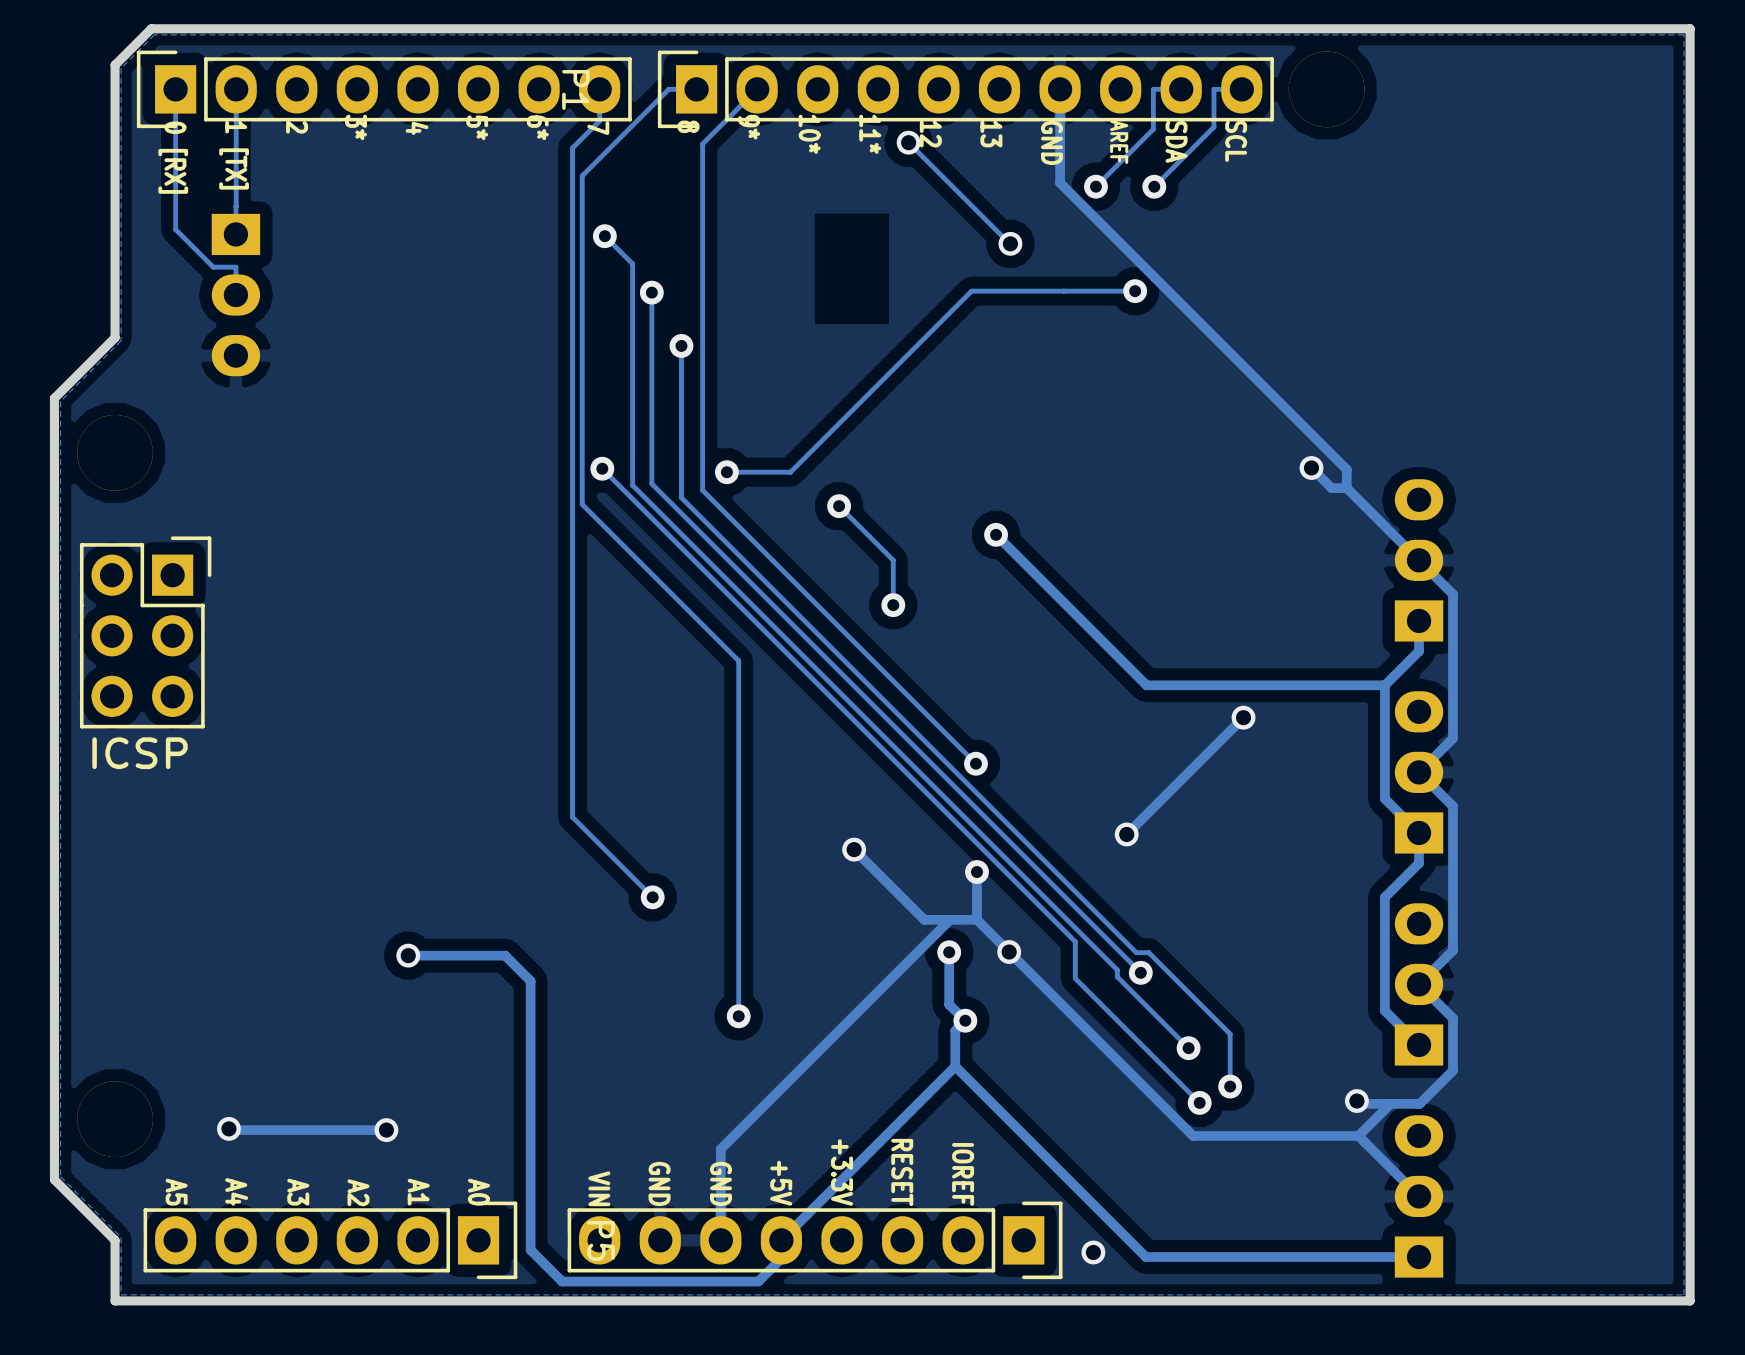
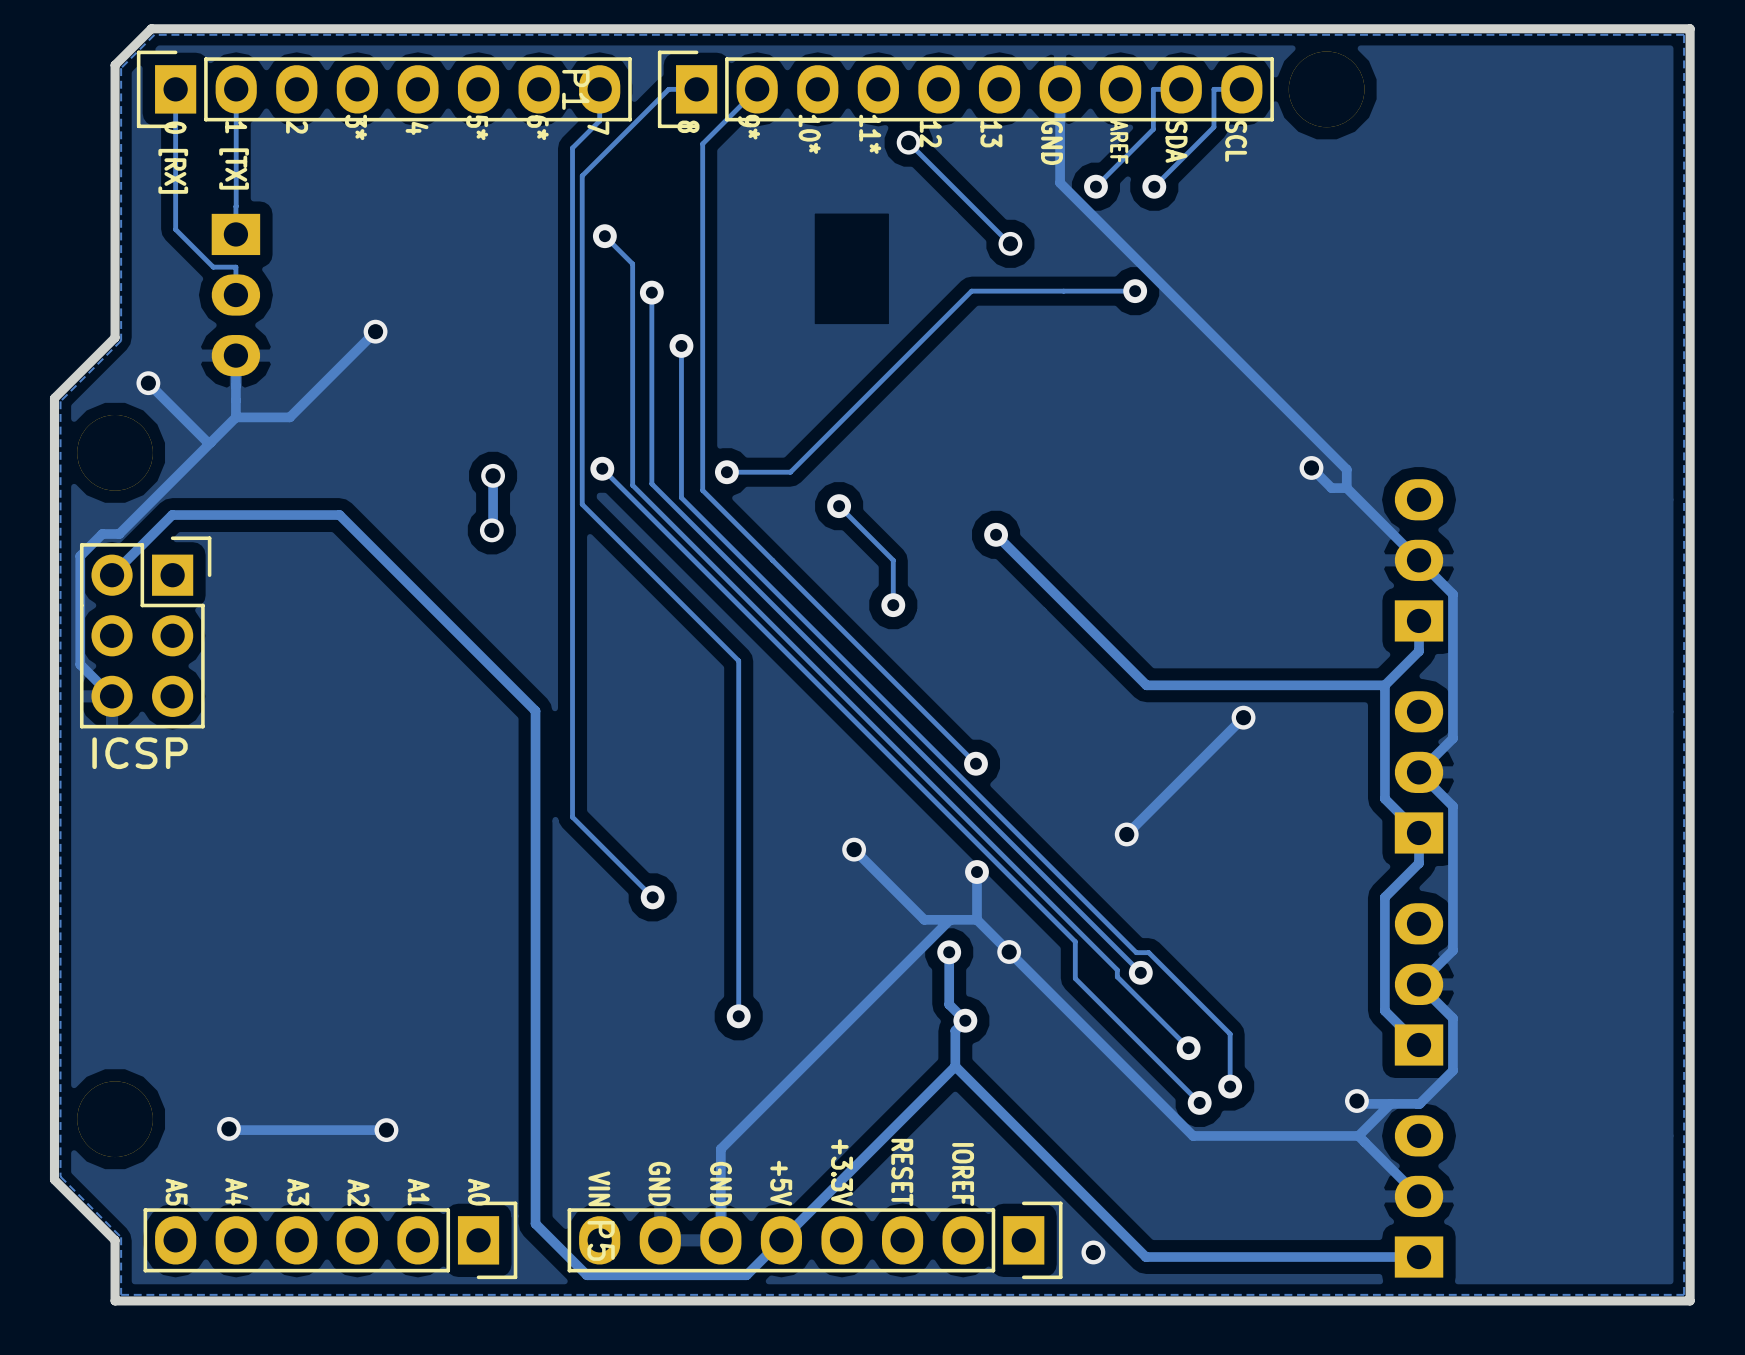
track: none -> (375, 331) (289, 417) (235, 417)
via: none -> (375, 331)
track: none -> (235, 355) (235, 417)
track: none -> (148, 383) (207, 442) (210, 442)
via: none -> (148, 383)
track: none -> (235, 417) (119, 534) (102, 534) (80, 556) (80, 664) (112, 696)
track: none -> (493, 475) (491, 530)
via: none -> (493, 475)
via: none -> (491, 530)
track: (408, 955) (505, 955) (530, 981) (530, 1250) (562, 1281) (758, 1281) (781, 1258) (781, 1240) -> (112, 575) (172, 515) (339, 515) (535, 710) (535, 1223) (586, 1275) (746, 1275) (781, 1240)
via: (408, 955) -> none

